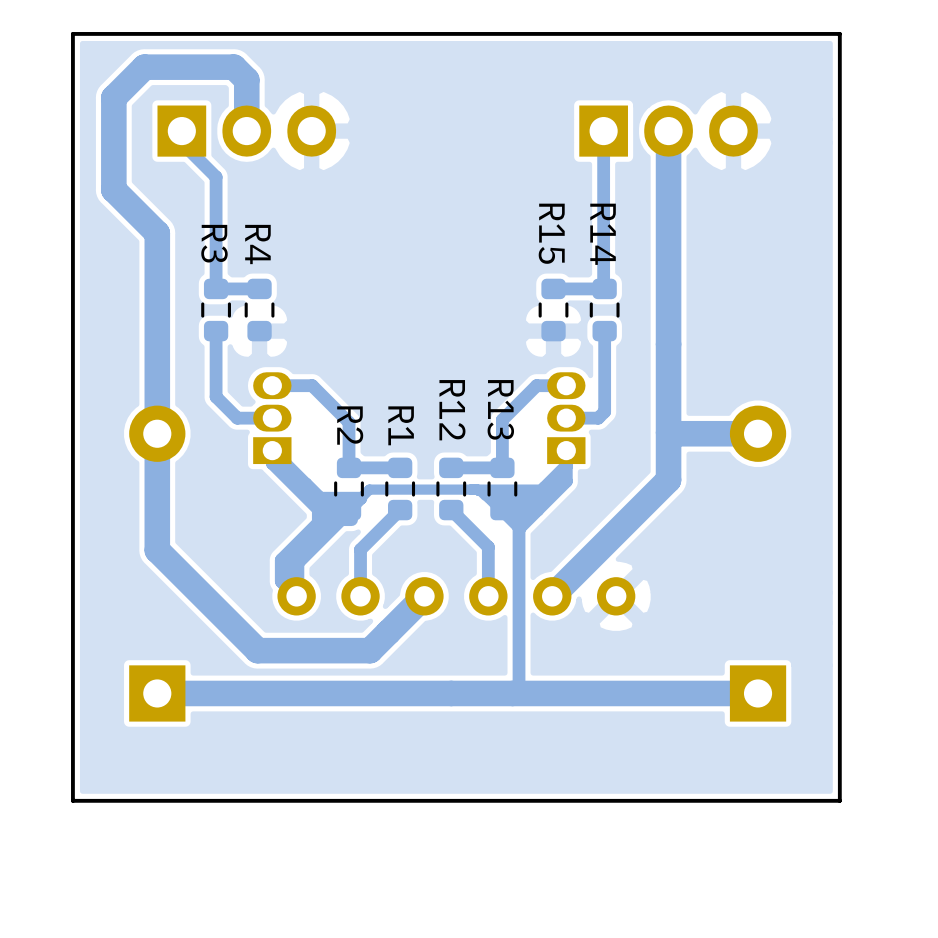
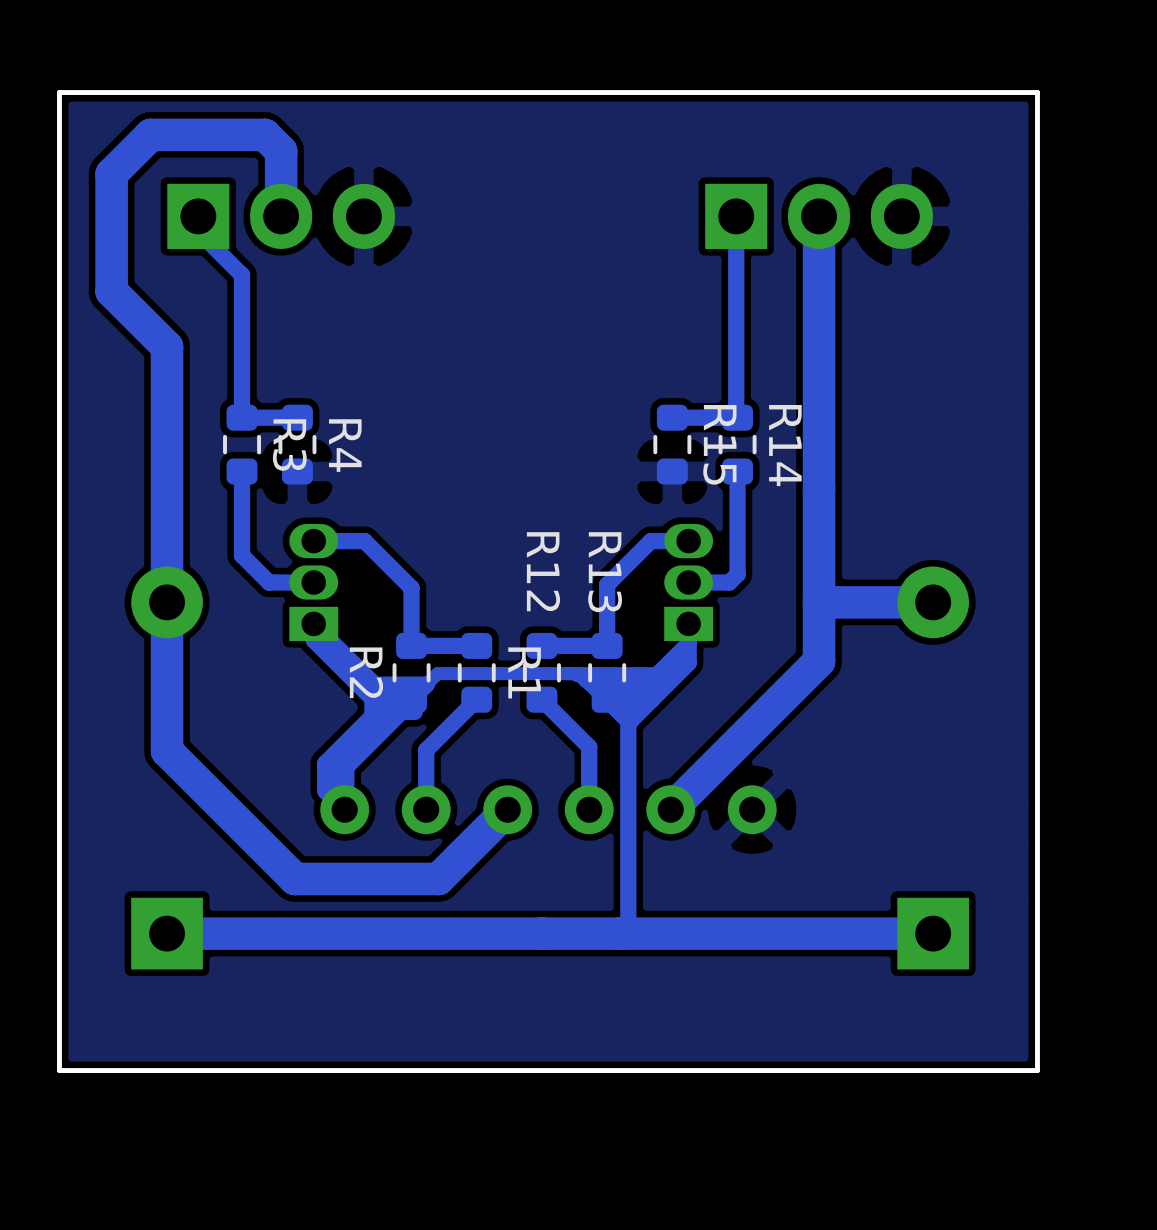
R15 name position: R15 (551, 233) -> R15 (719, 444)
R14 name position: R14 (603, 234) -> R14 (785, 445)
R3 name position: R3 (214, 243) -> R3 (289, 445)
R4 name position: R4 (257, 244) -> R4 (345, 445)
R2 name position: R2 (350, 425) -> R2 (366, 672)
R1 name position: R1 (401, 425) -> R1 (524, 672)

